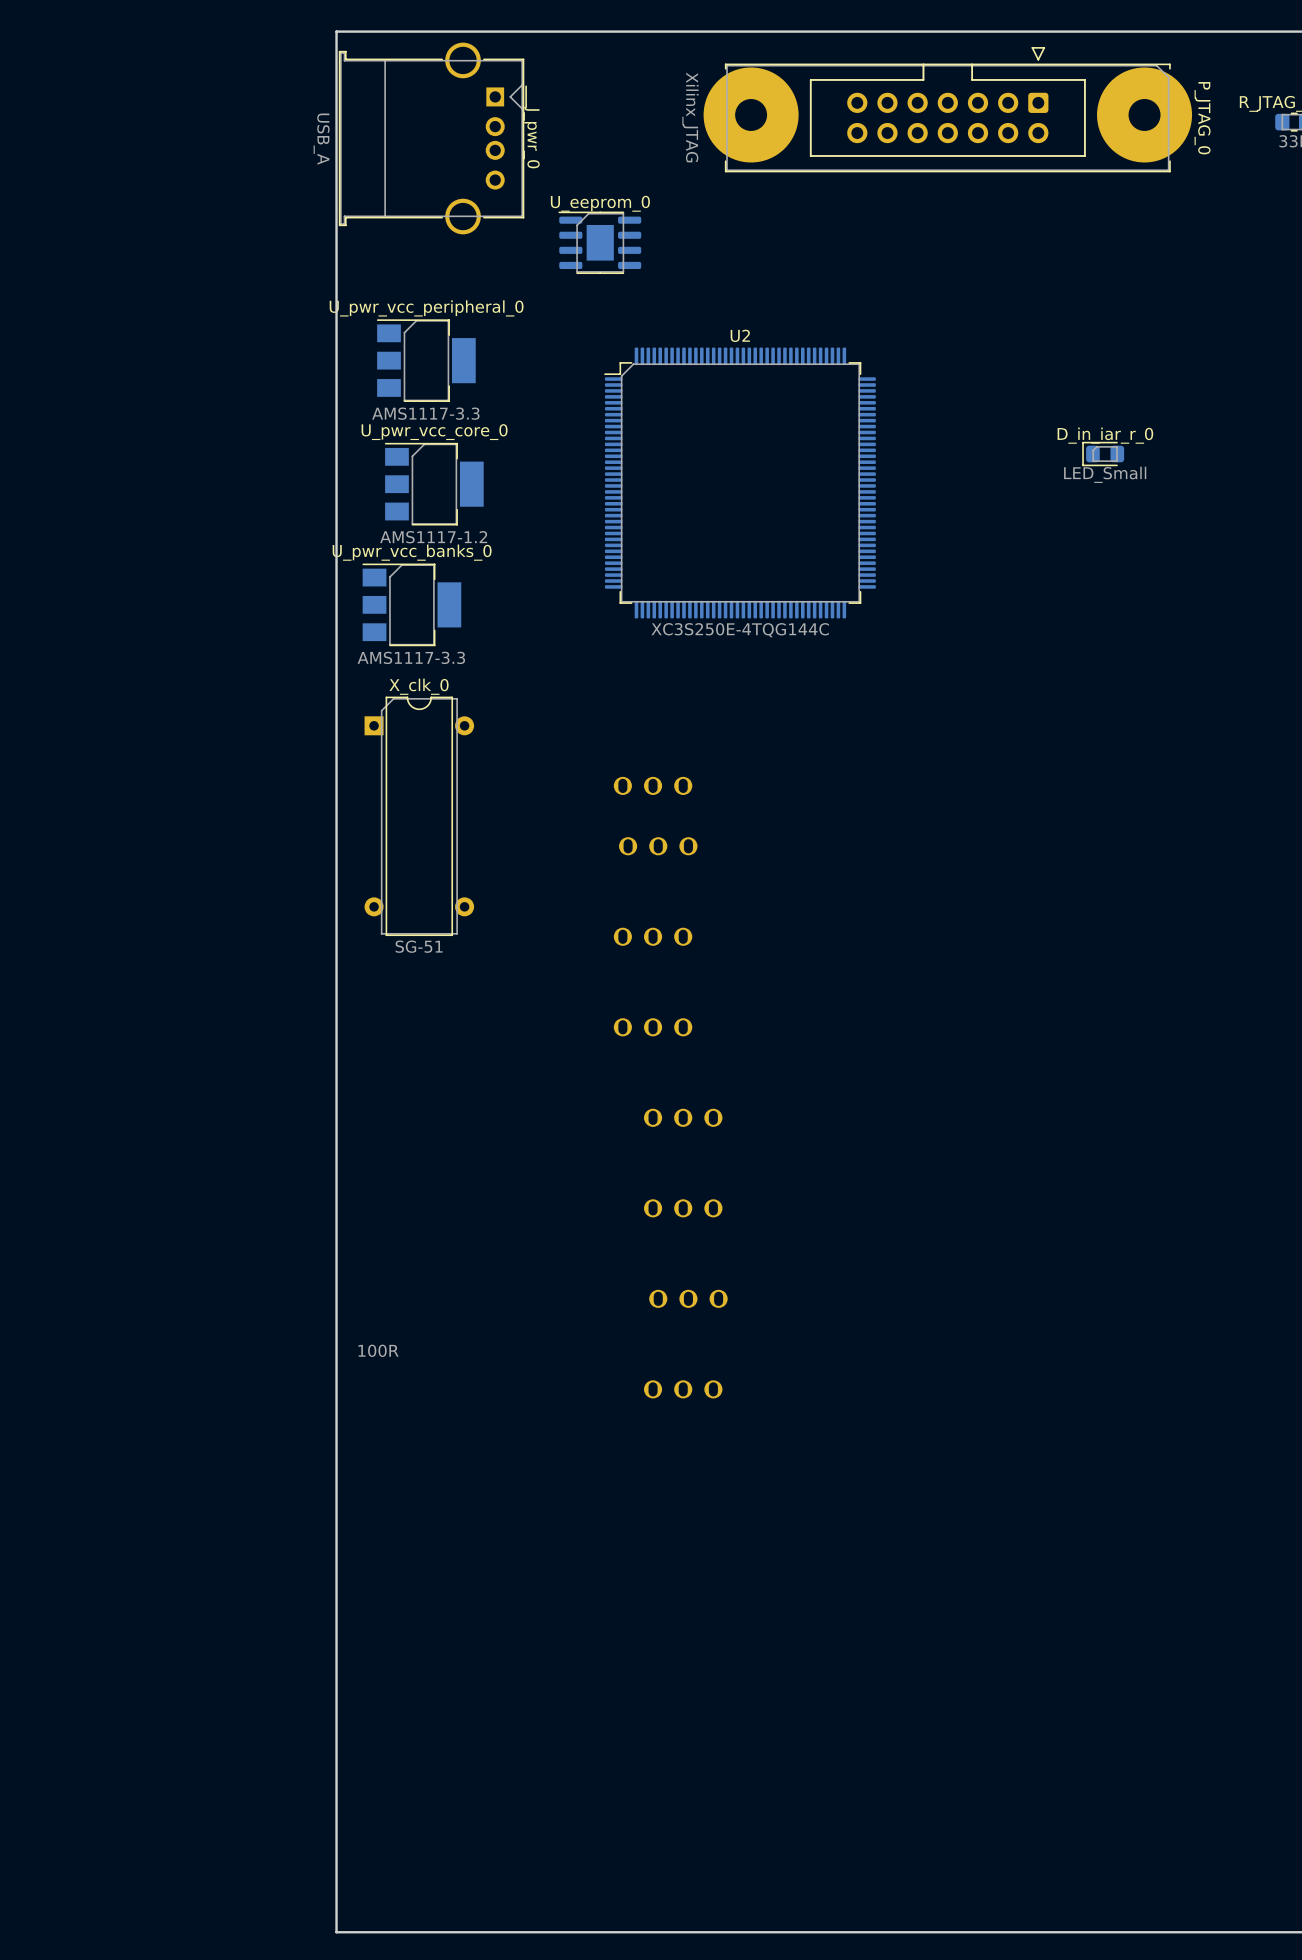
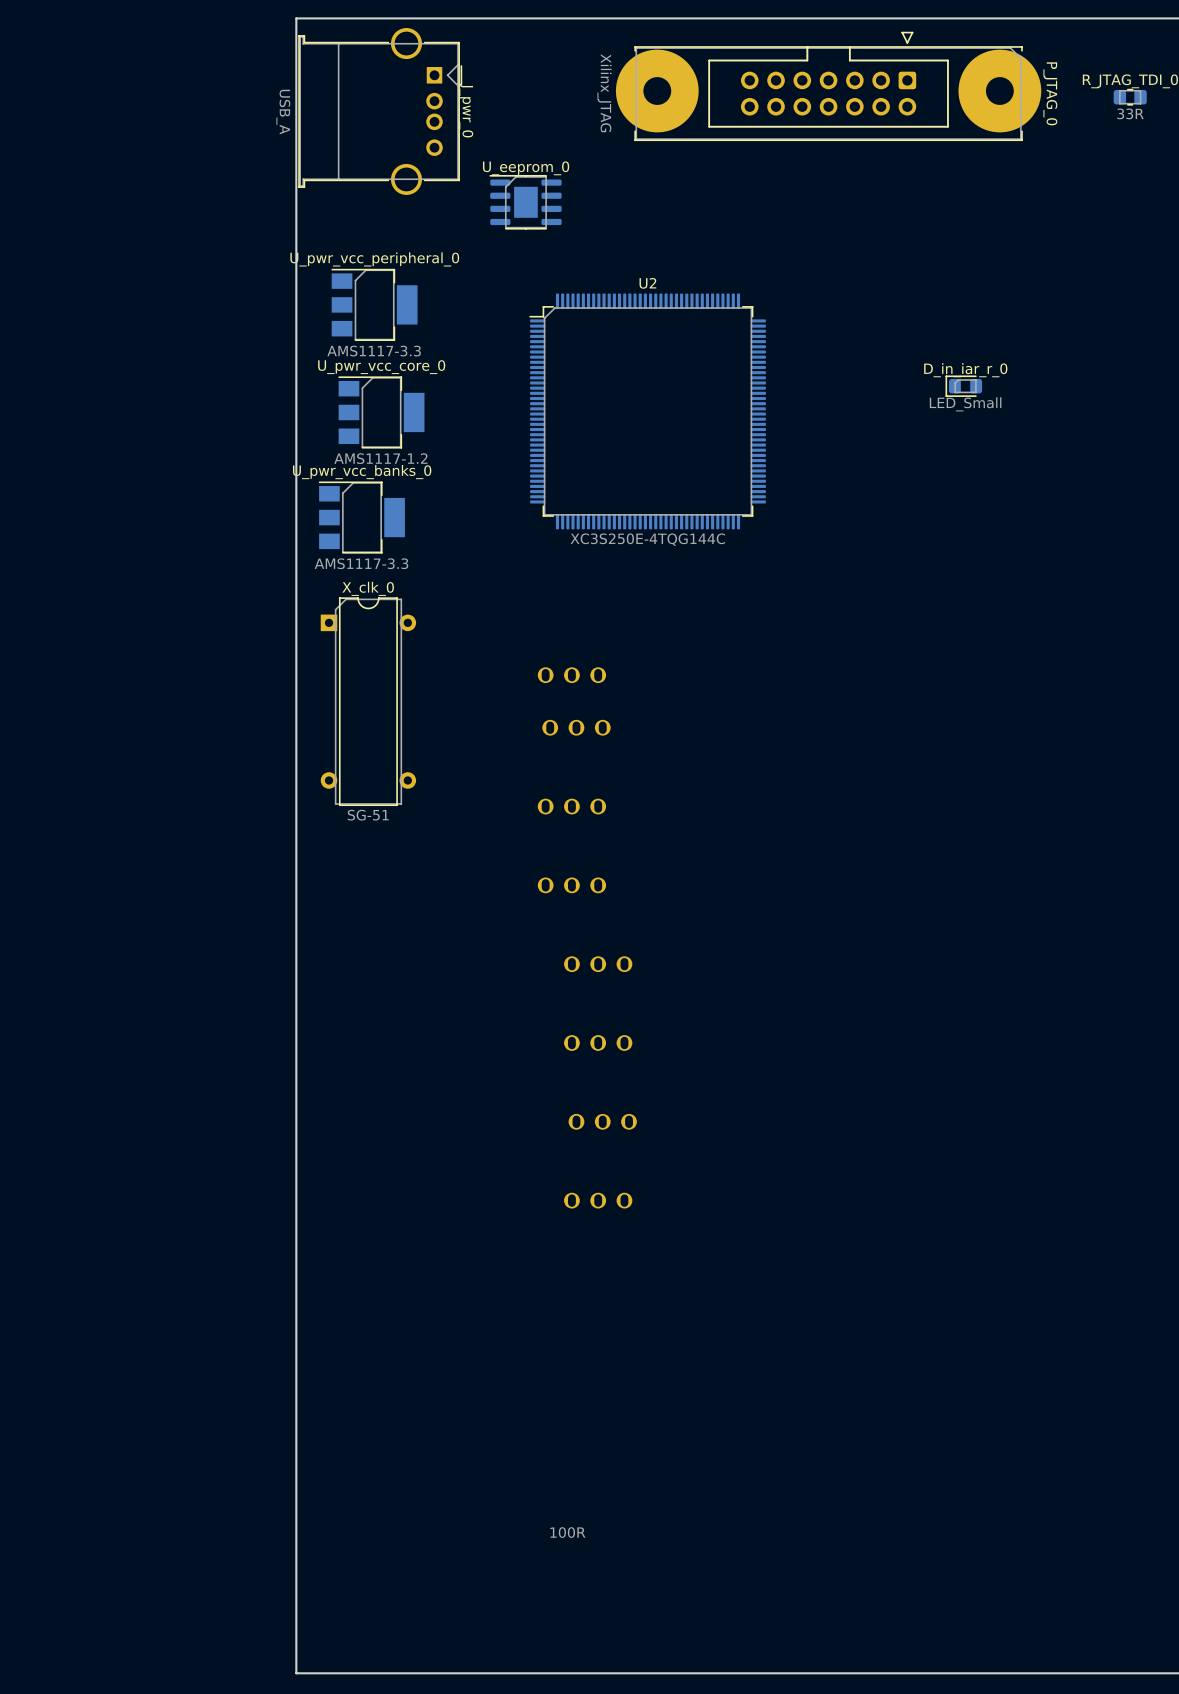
part: 100R (378, 1350) -> none
part: none -> 100R (567, 1532)

